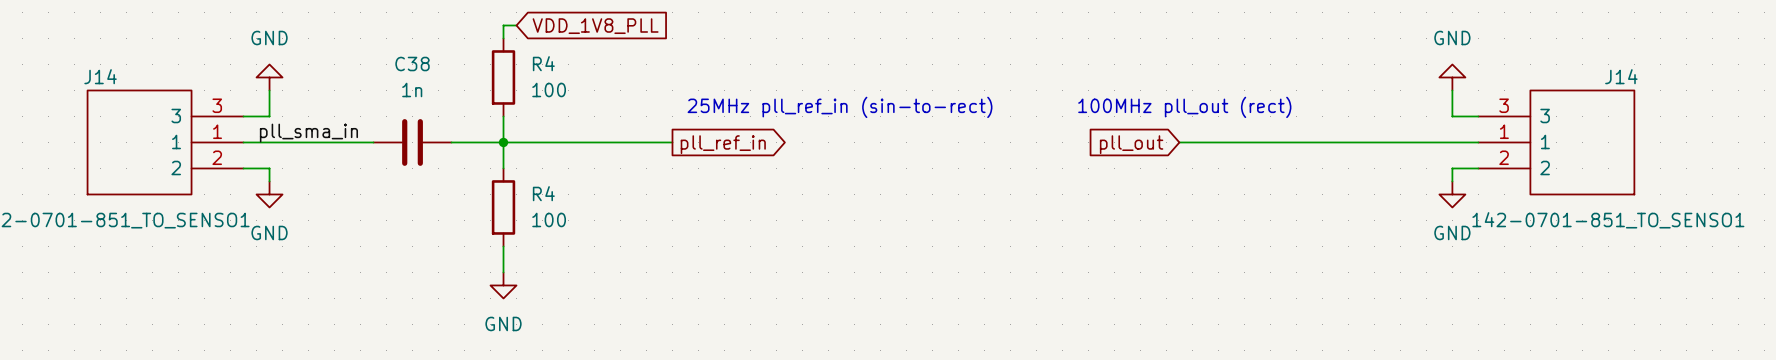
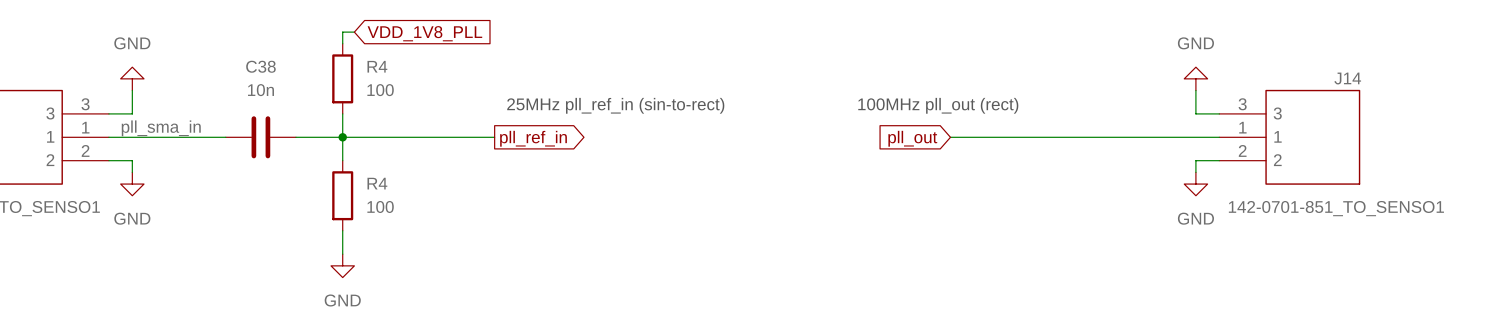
C38 value: 1n (412, 90) -> 10n (260, 90)

